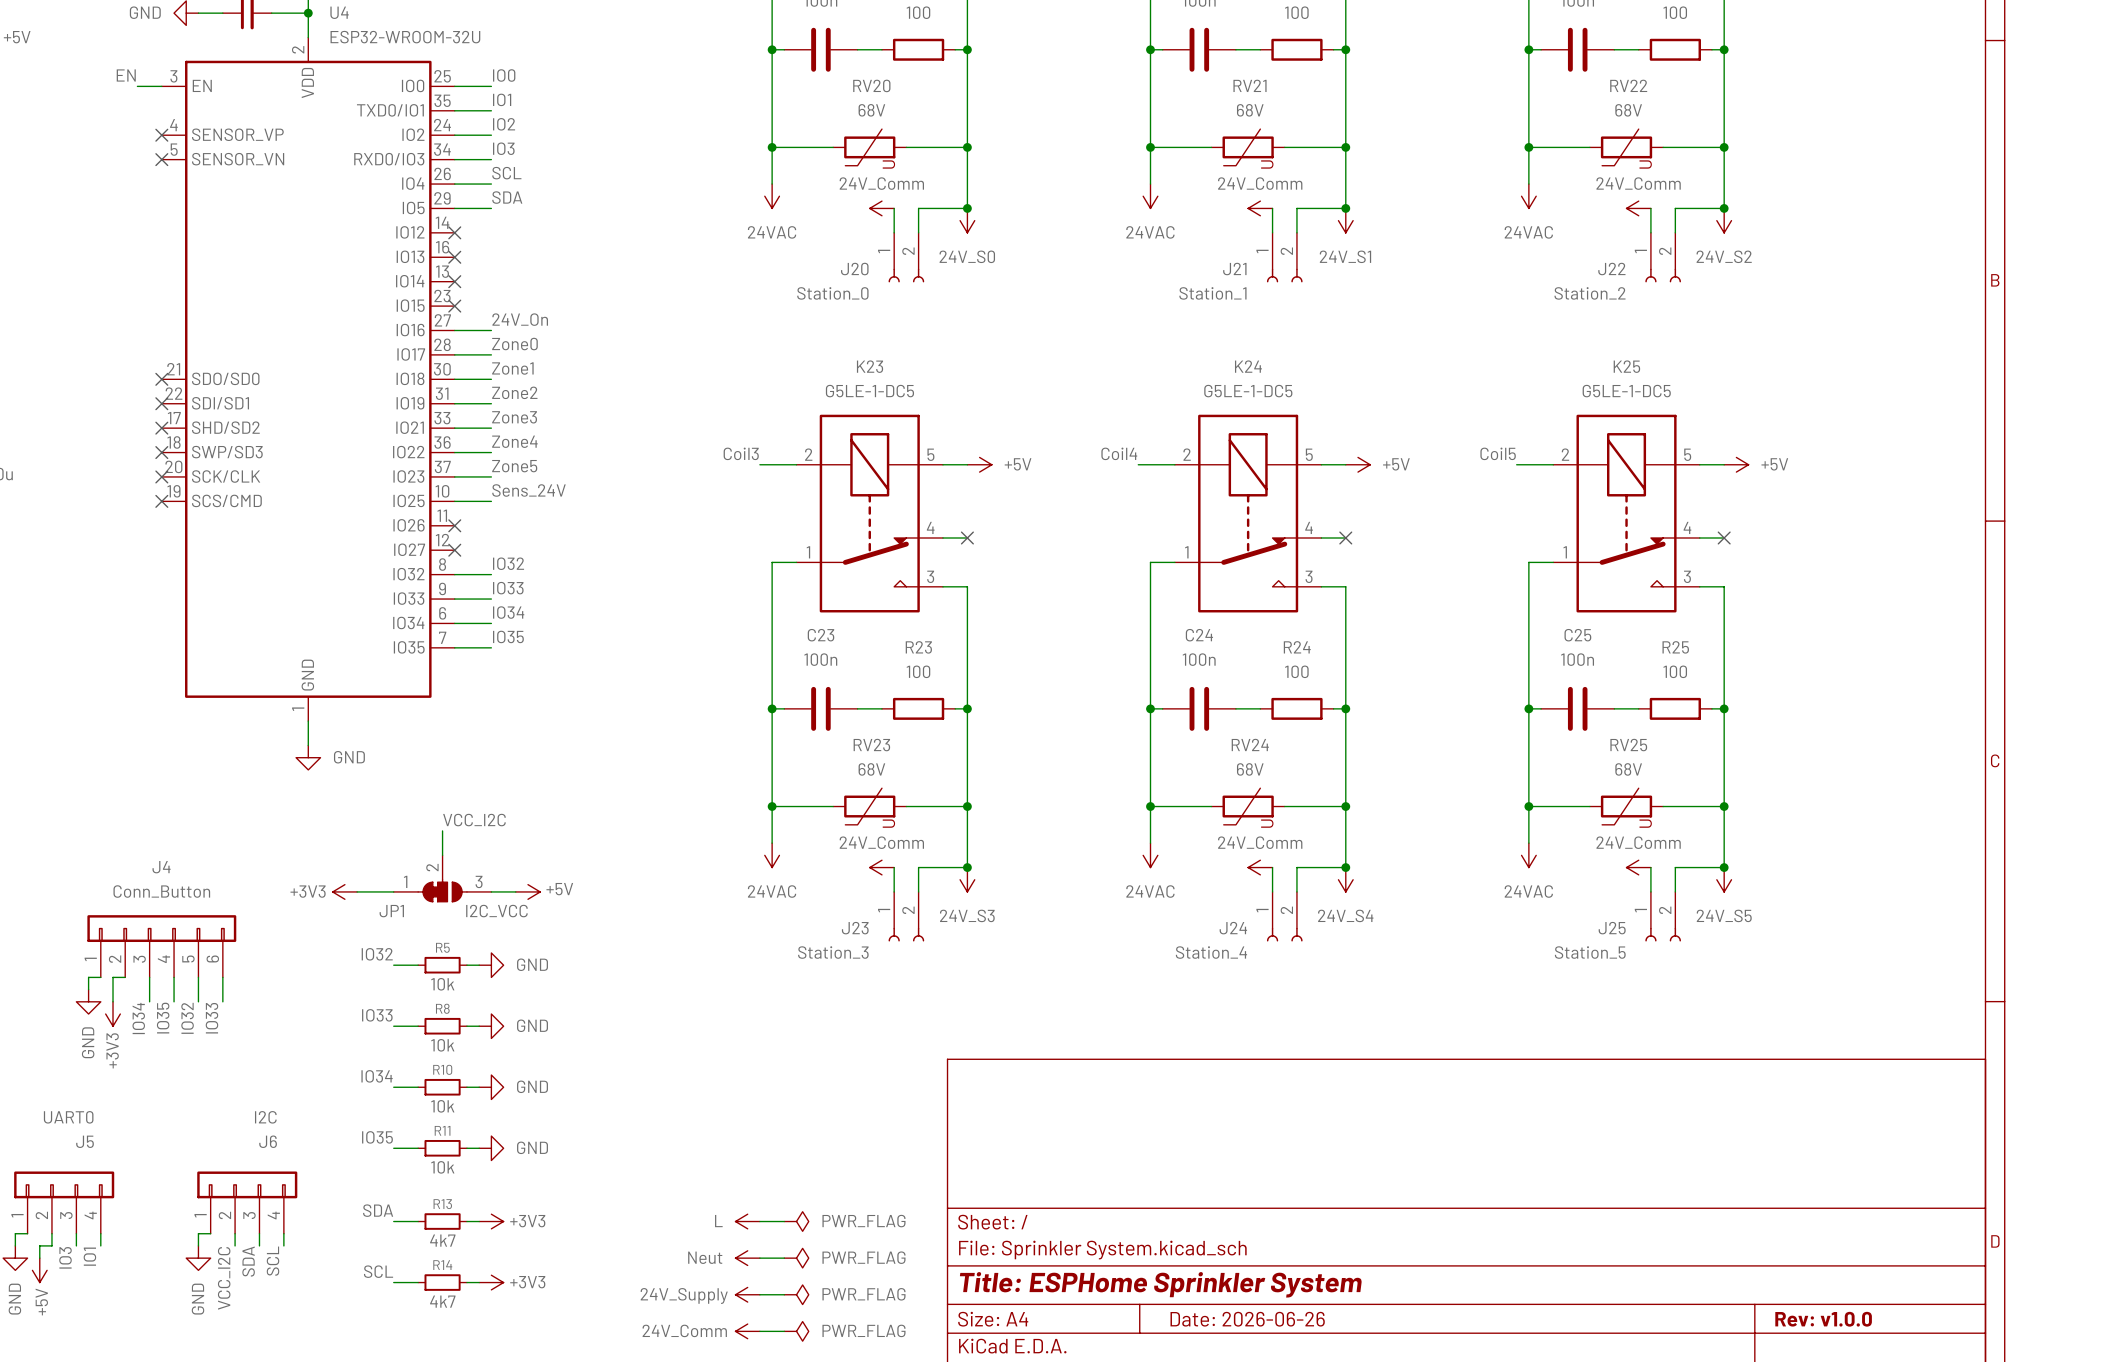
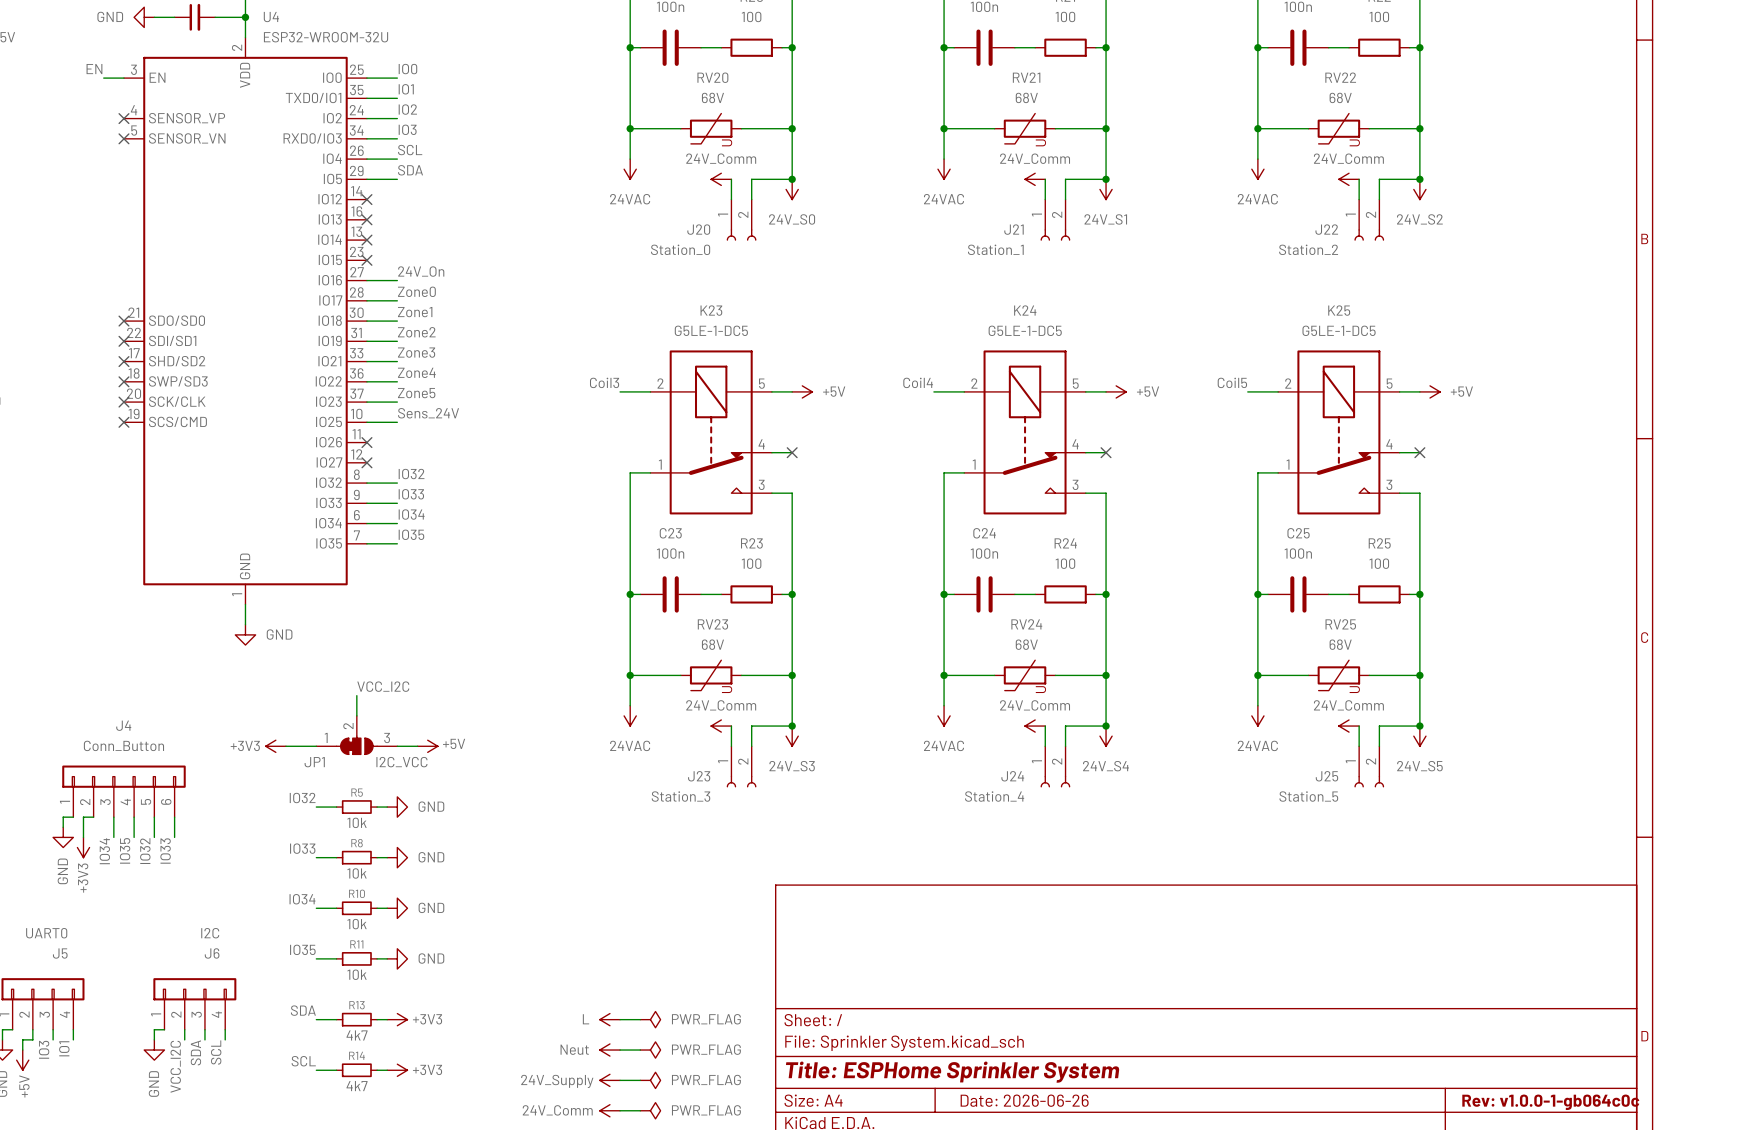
title block: Rev: v1.0.0 (1823, 1319) -> Rev: v1.0.0-1-gb064c0c (1550, 1102)

